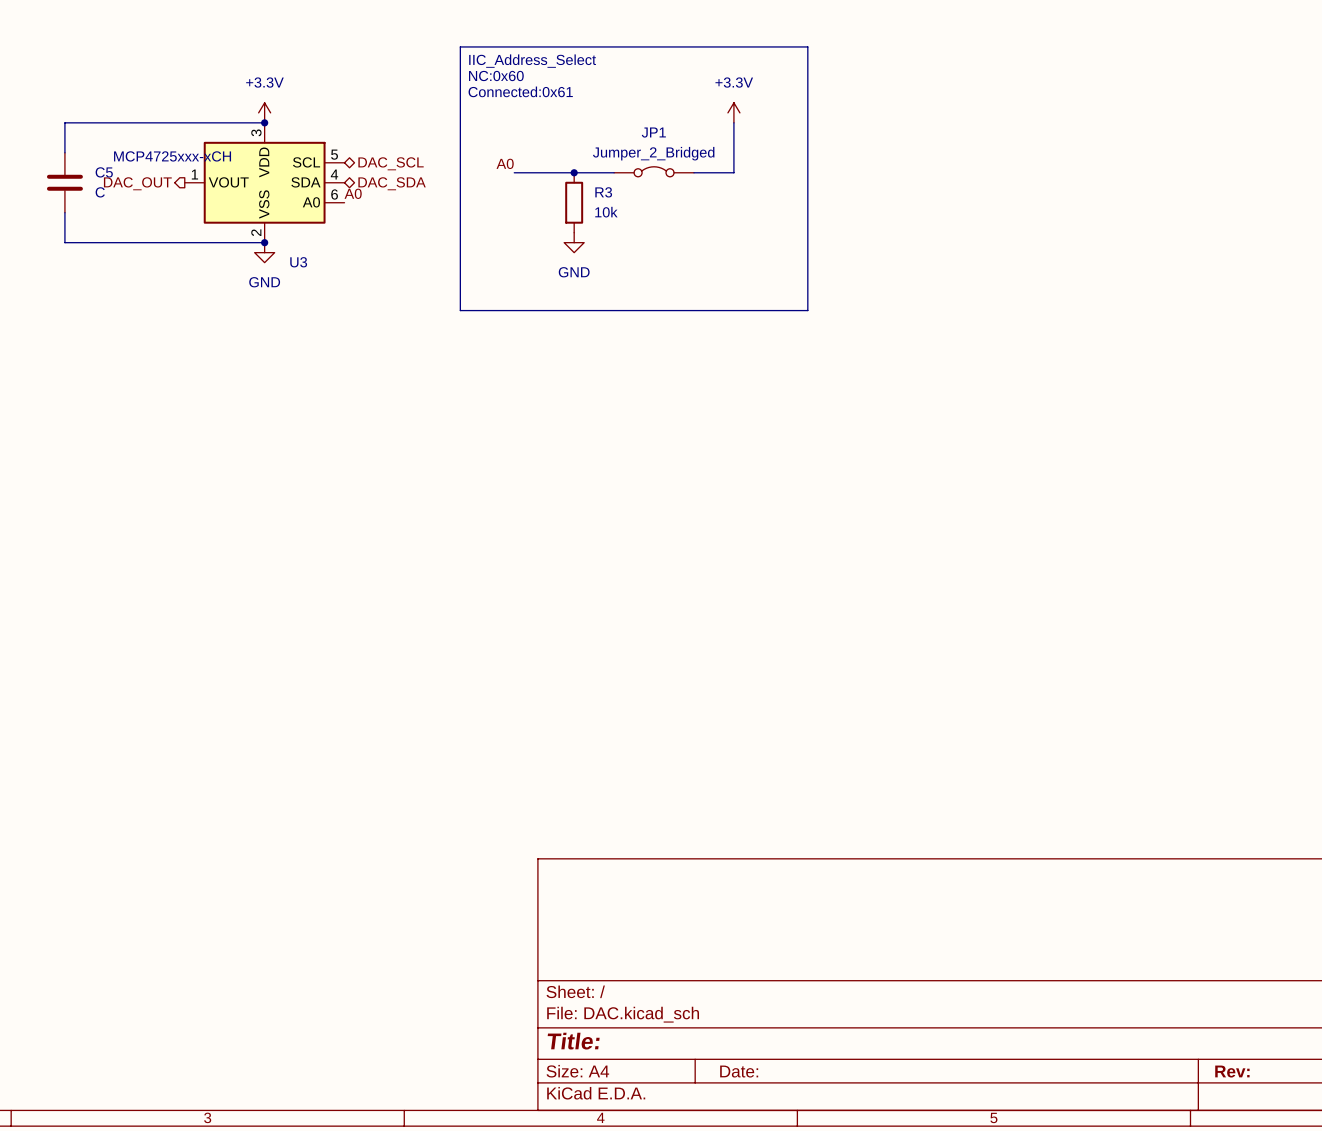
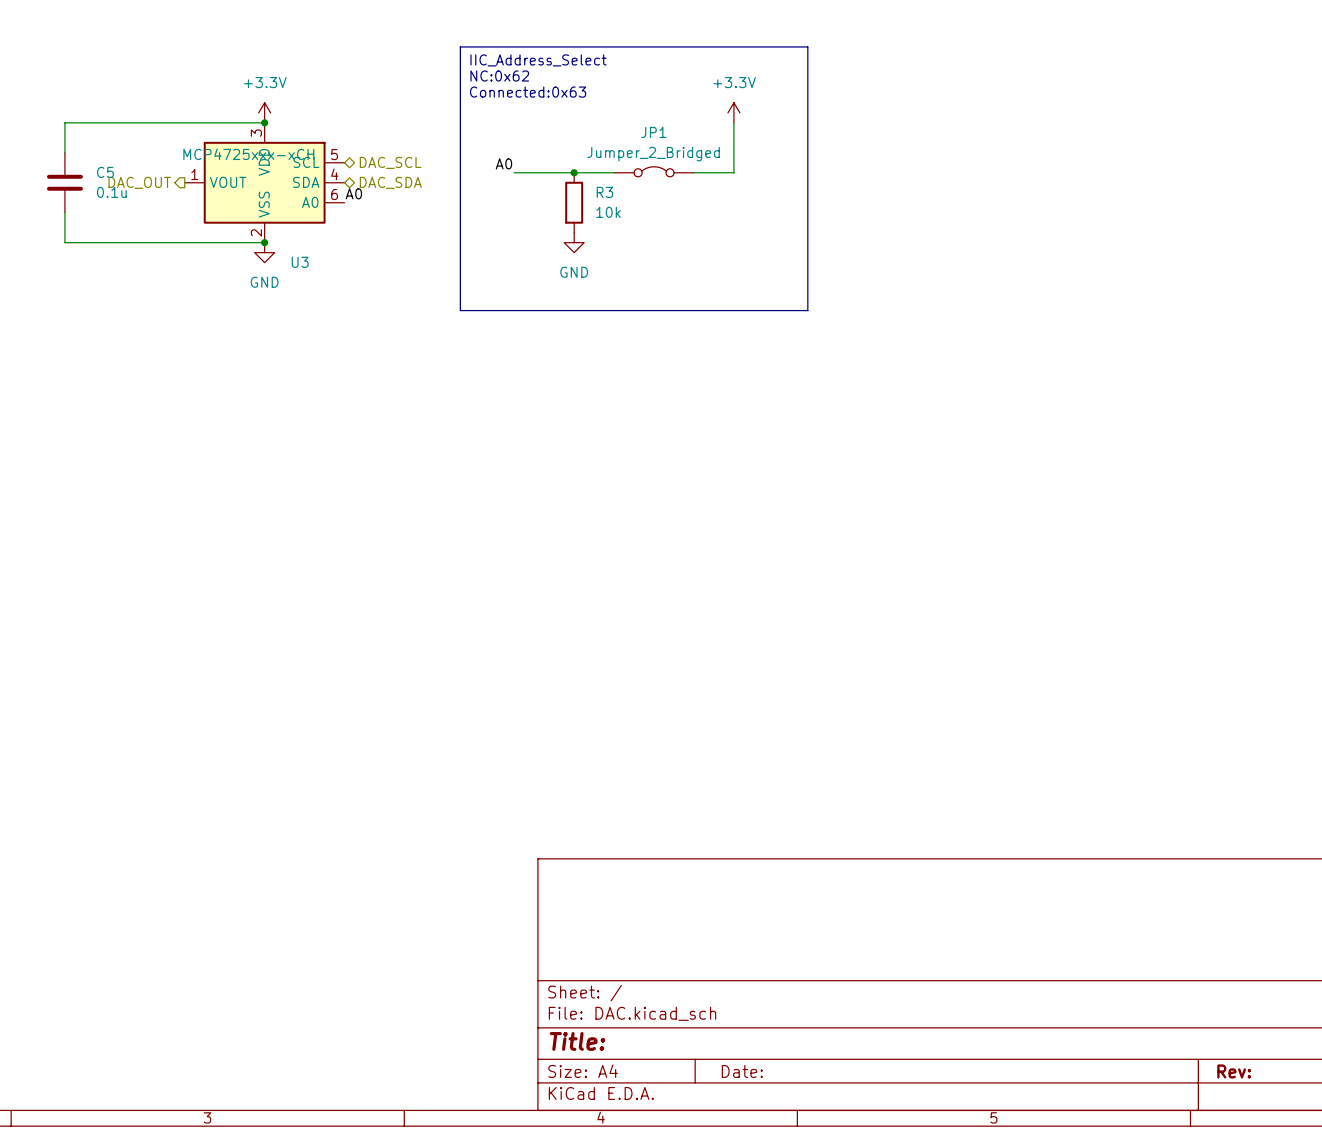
text: NC:0x60 (496, 76) -> NC:0x62 (499, 76)
text: Connected:0x61 (520, 91) -> Connected:0x63 (528, 92)
U3 value position: MCP4725xxx-xCH (172, 156) -> MCP4725xxx-xCH (248, 154)
C5 value: C (100, 192) -> 0.1u (111, 192)

